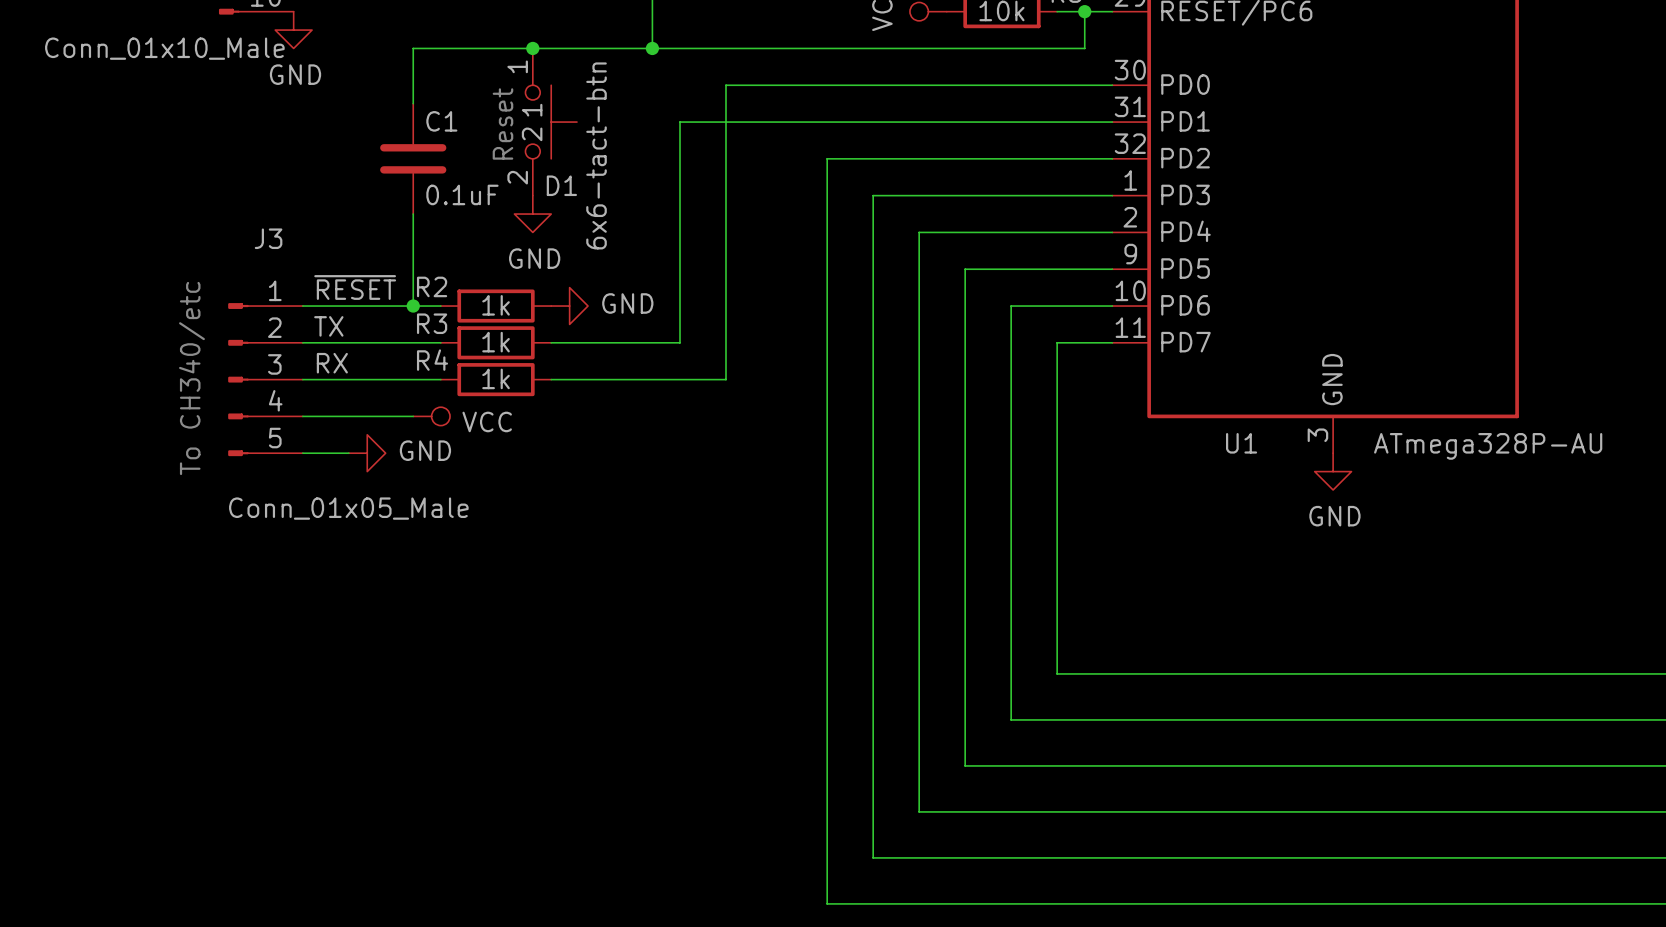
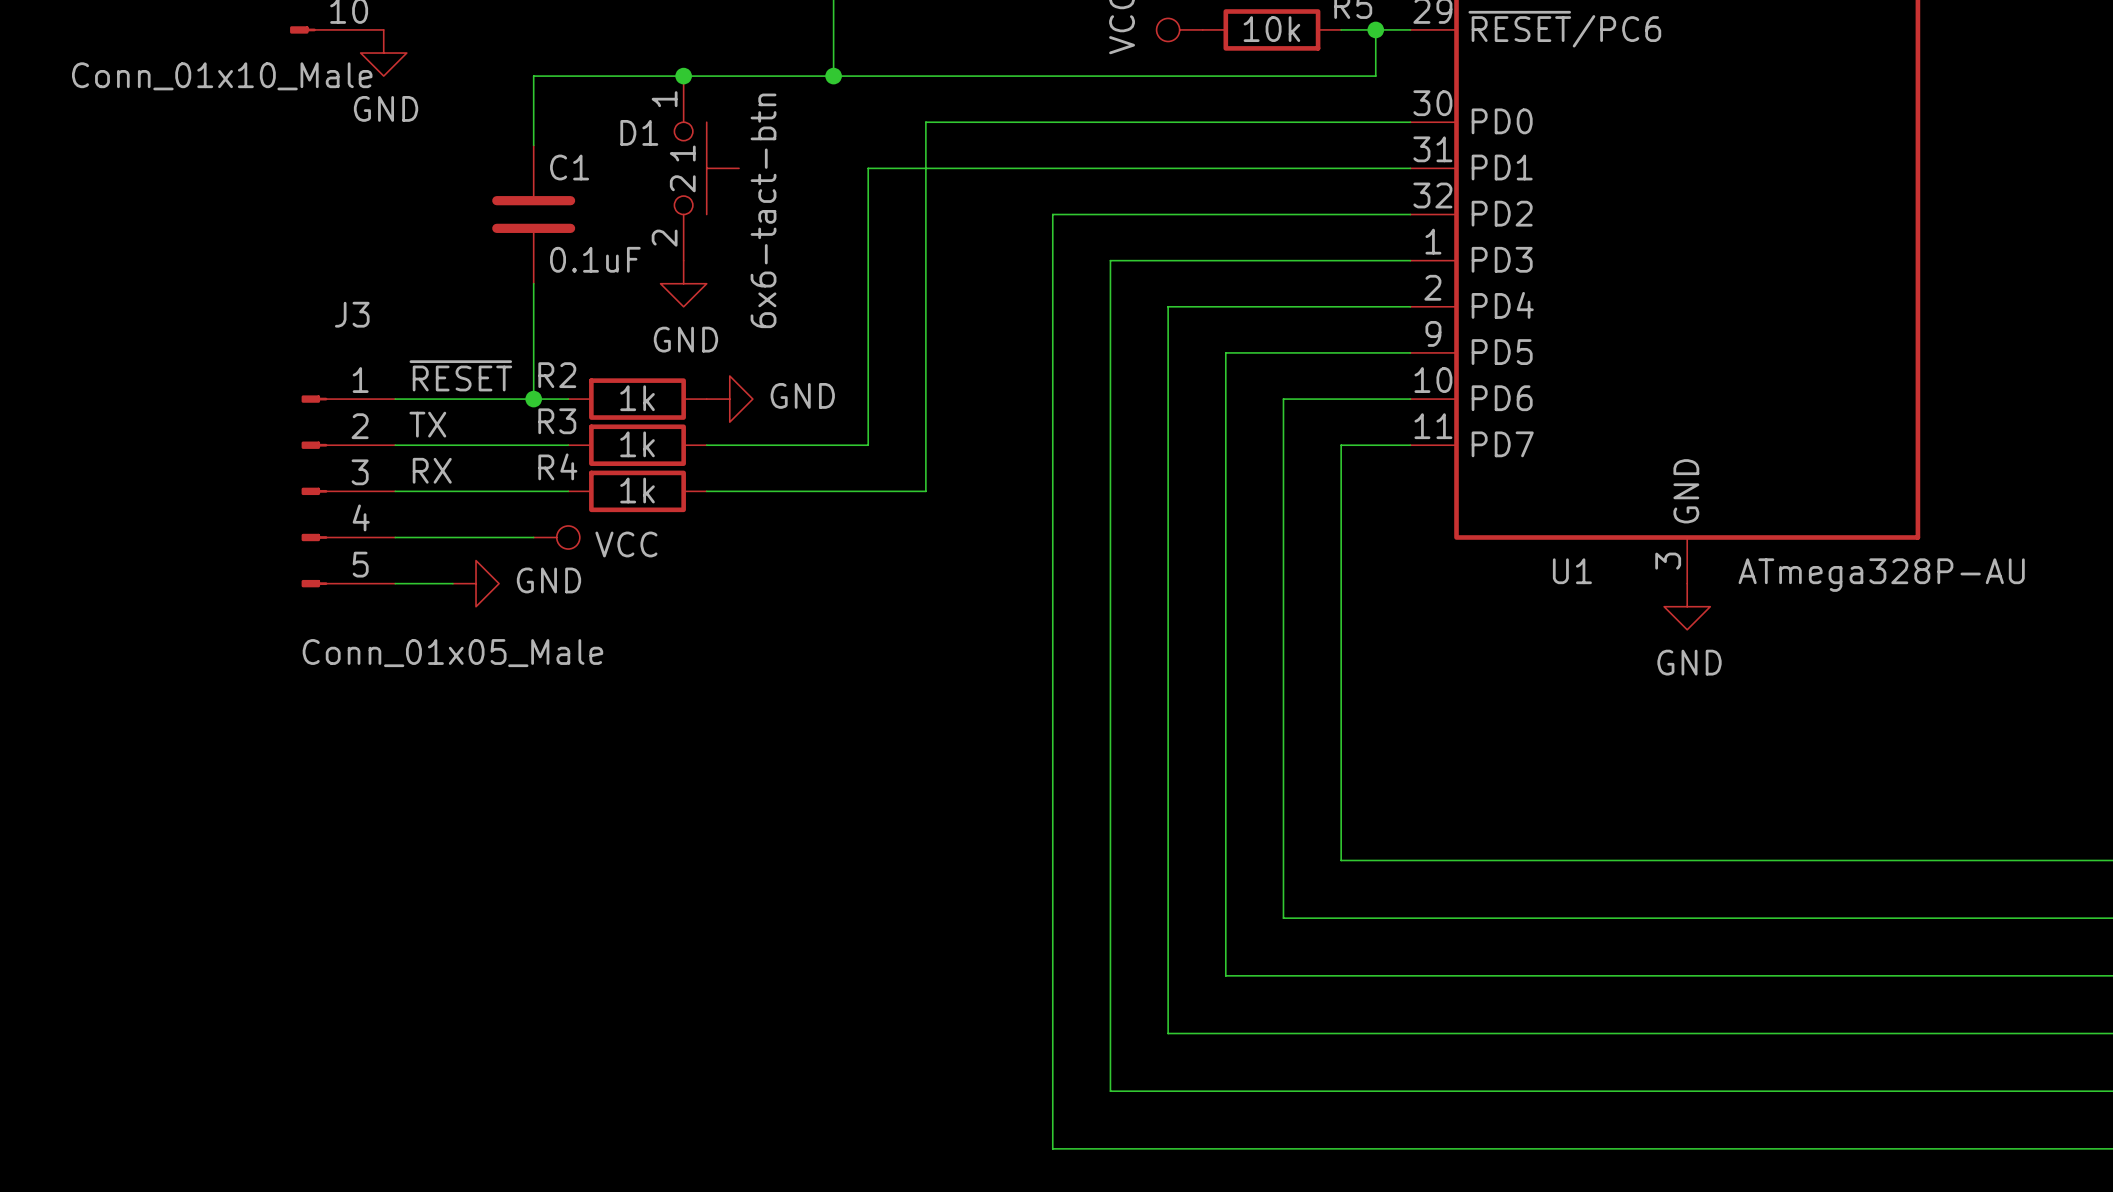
text: Reset (502, 123) -> none
D1 name position: D1 (561, 185) -> D1 (639, 132)
text: To CH340/etc (191, 378) -> none

